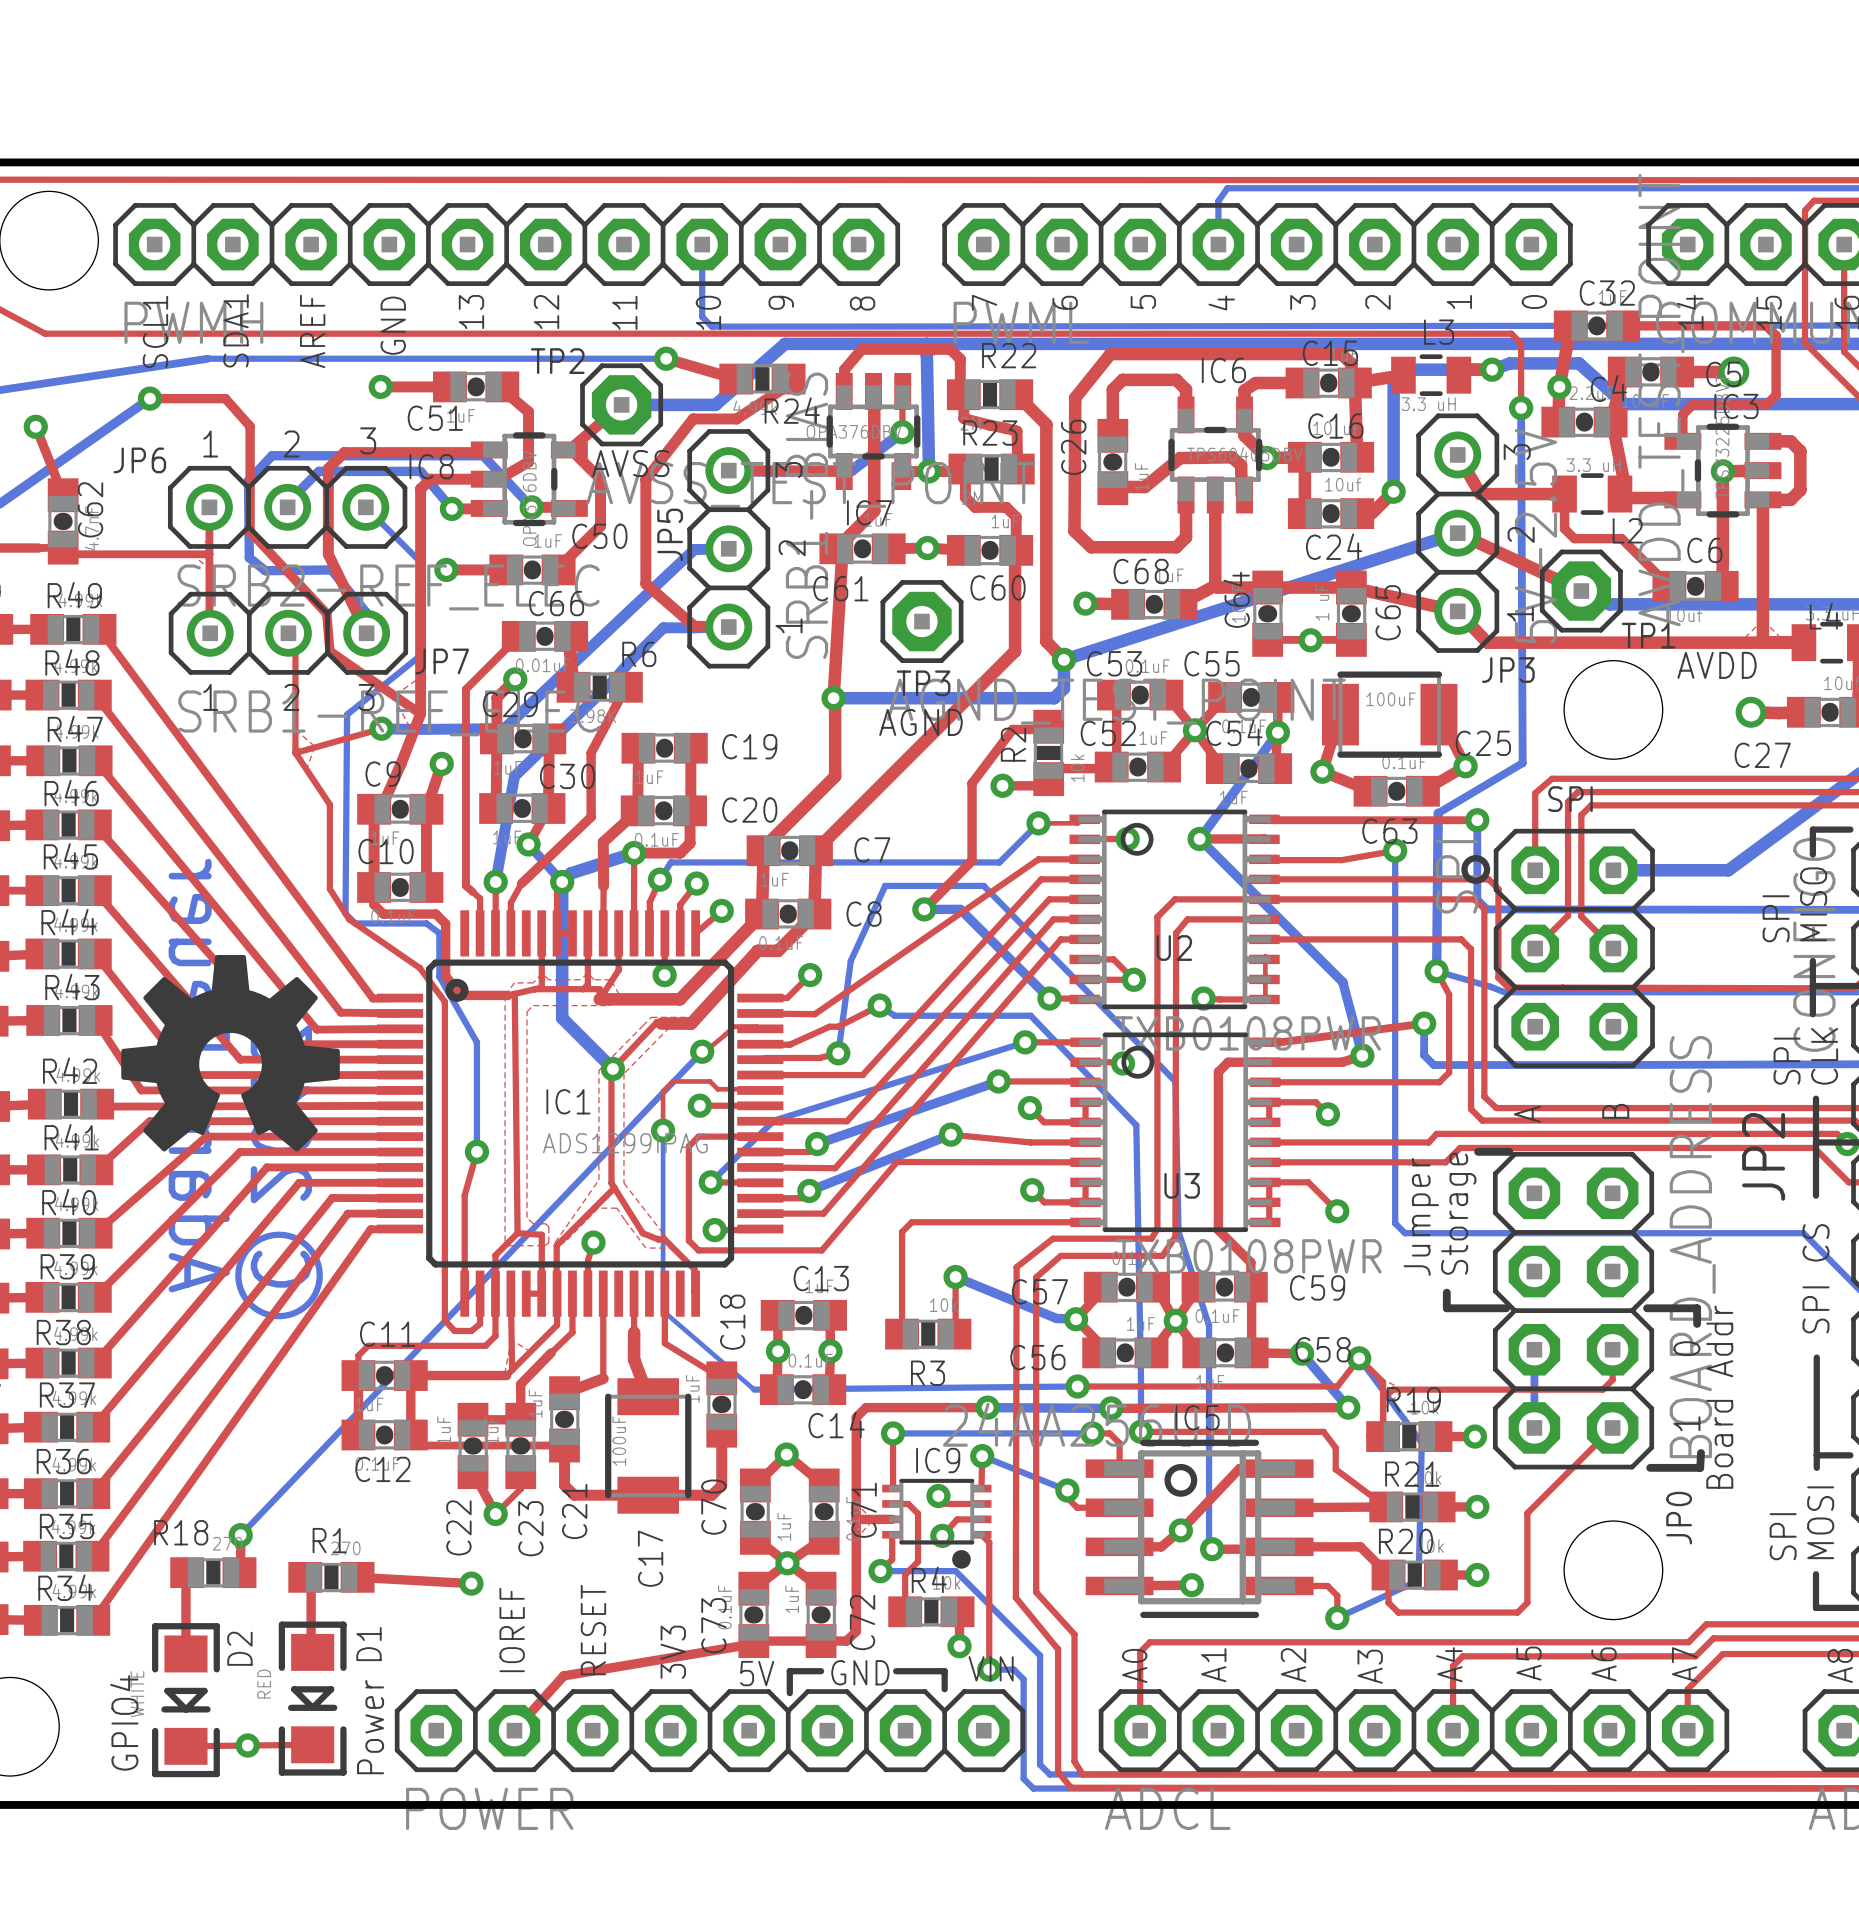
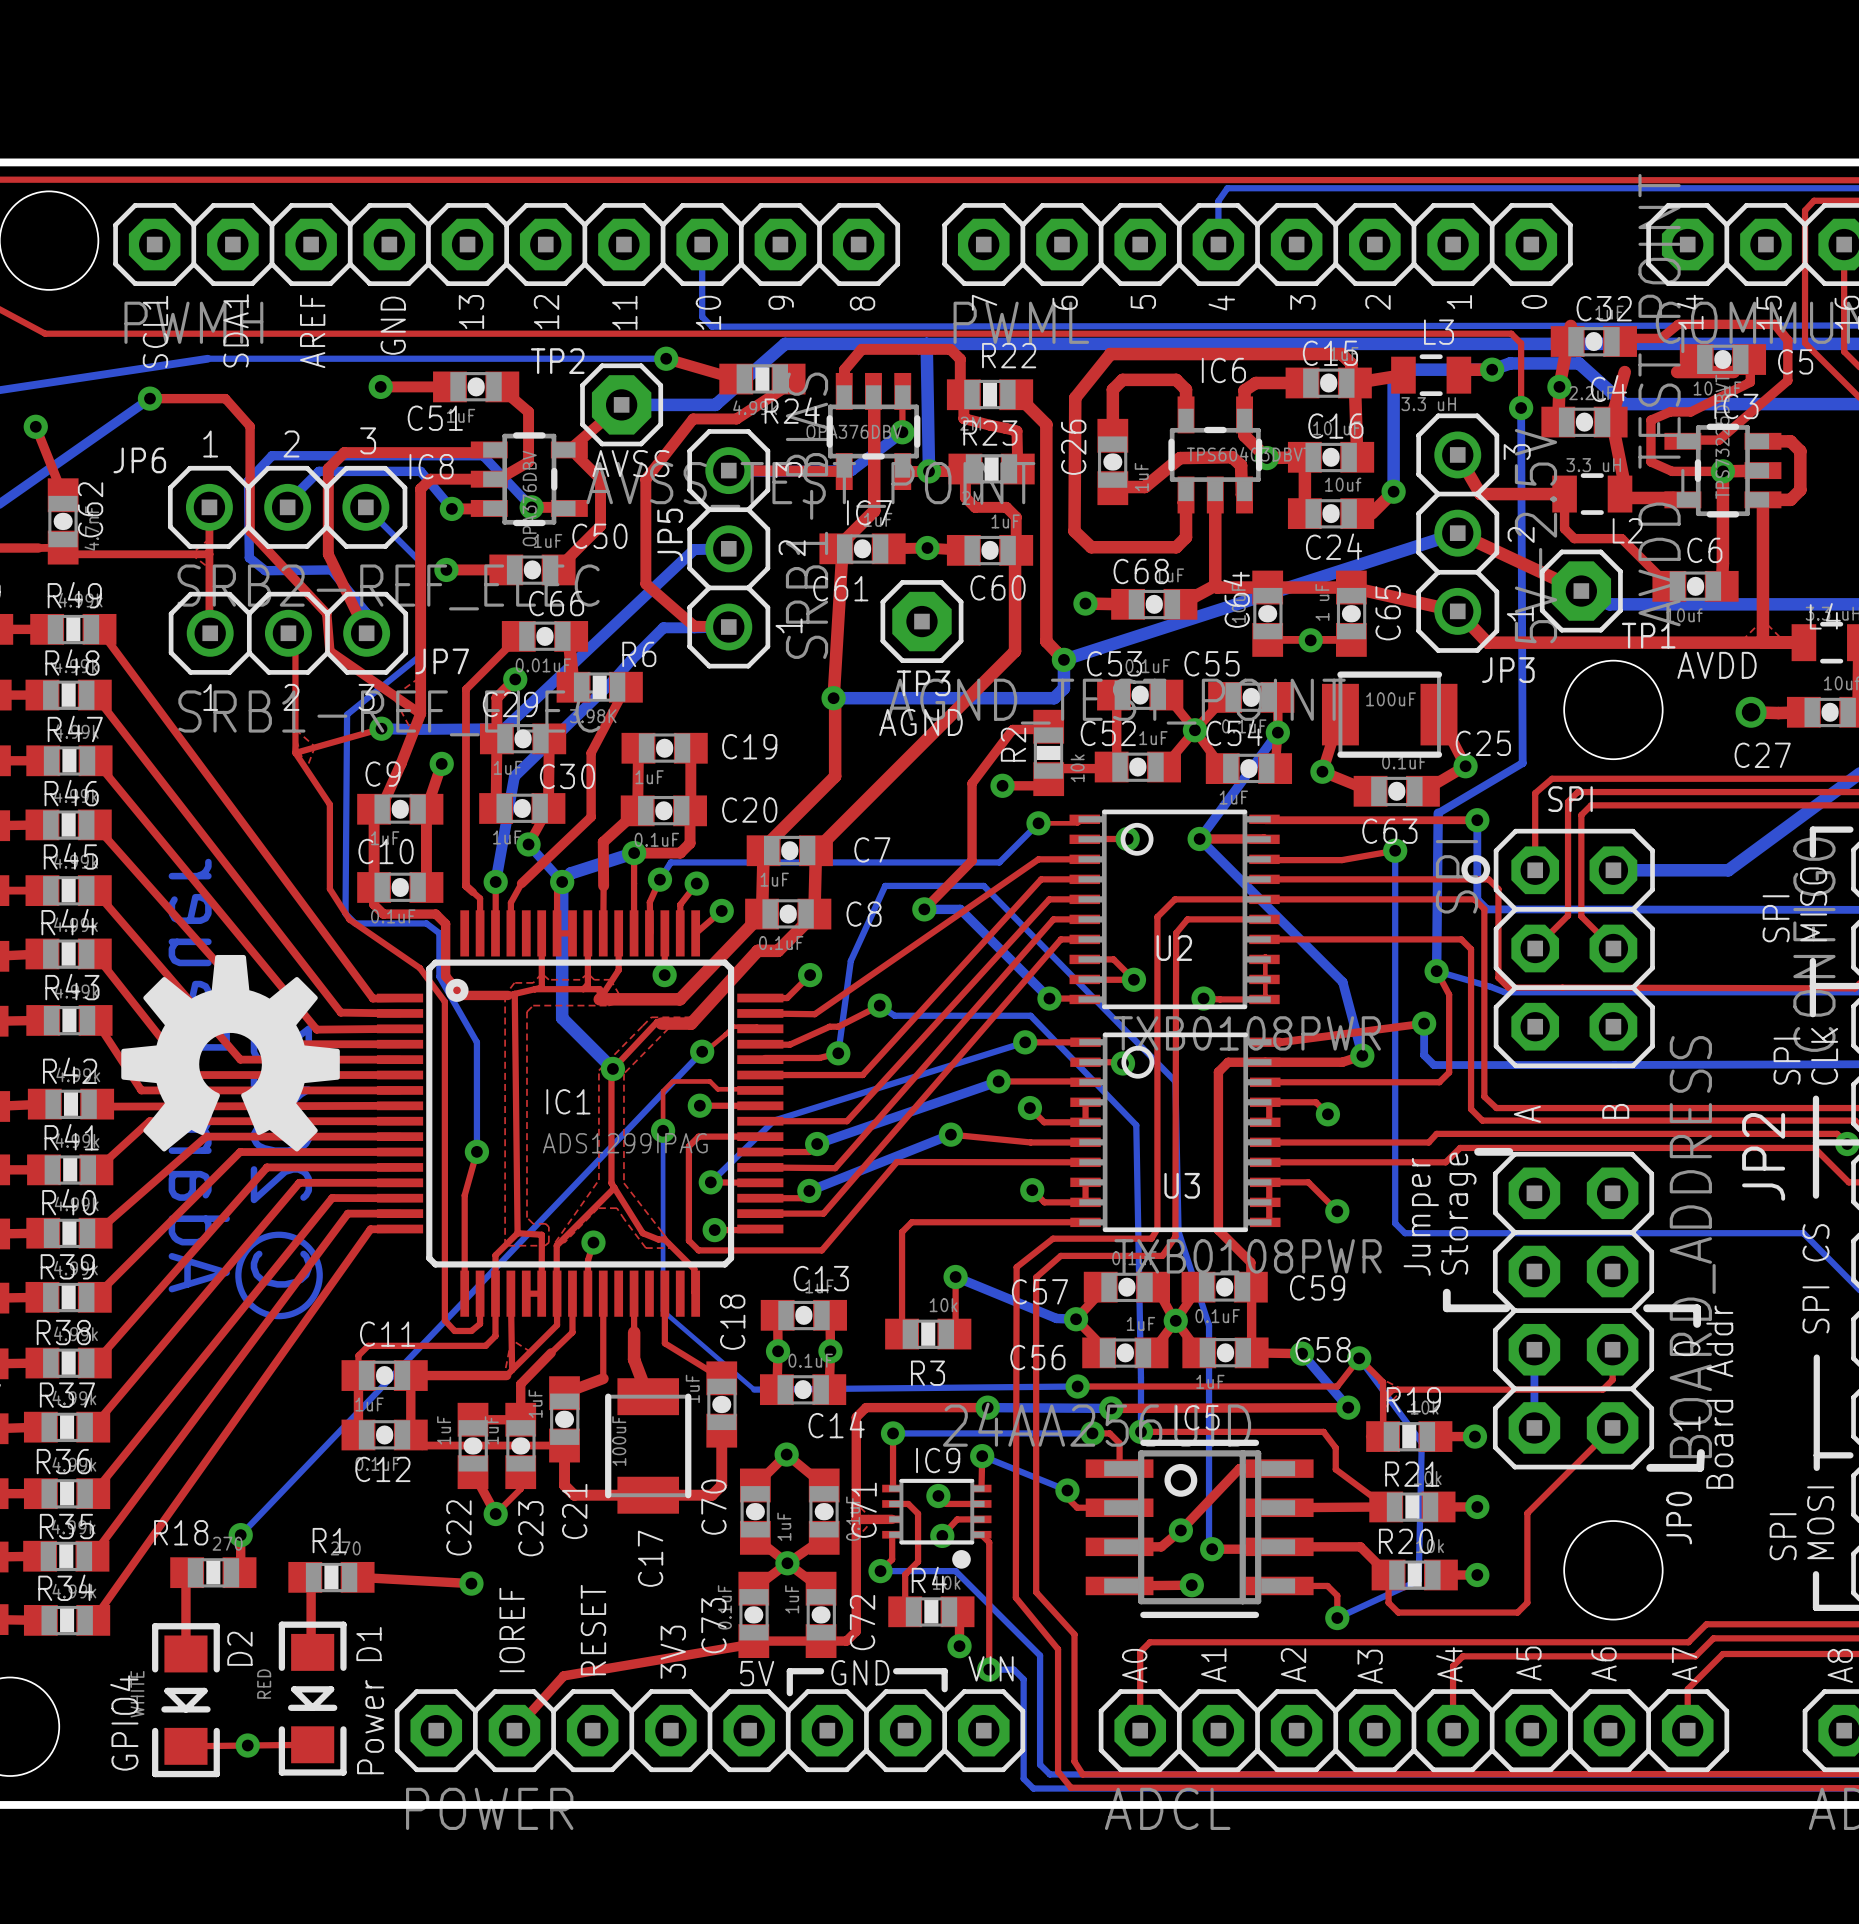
C32 position: (1596, 325) -> (1593, 341)
top track: (1623, 325) (1766, 325) (1776, 335) (1776, 395) (1766, 404) (1692, 404) (1682, 414) (1682, 441) -> (1620, 341) (1632, 338) (1661, 338) (1678, 324) (1774, 324) (1787, 340) (1787, 380) (1719, 440) (1682, 441)
top track: none -> (1749, 359) (1750, 382) (1690, 411) (1670, 411) (1650, 420) (1650, 461) (1672, 471) (1722, 471)
C5 position: (1650, 372) -> (1722, 359)
via: (1733, 372) -> none

